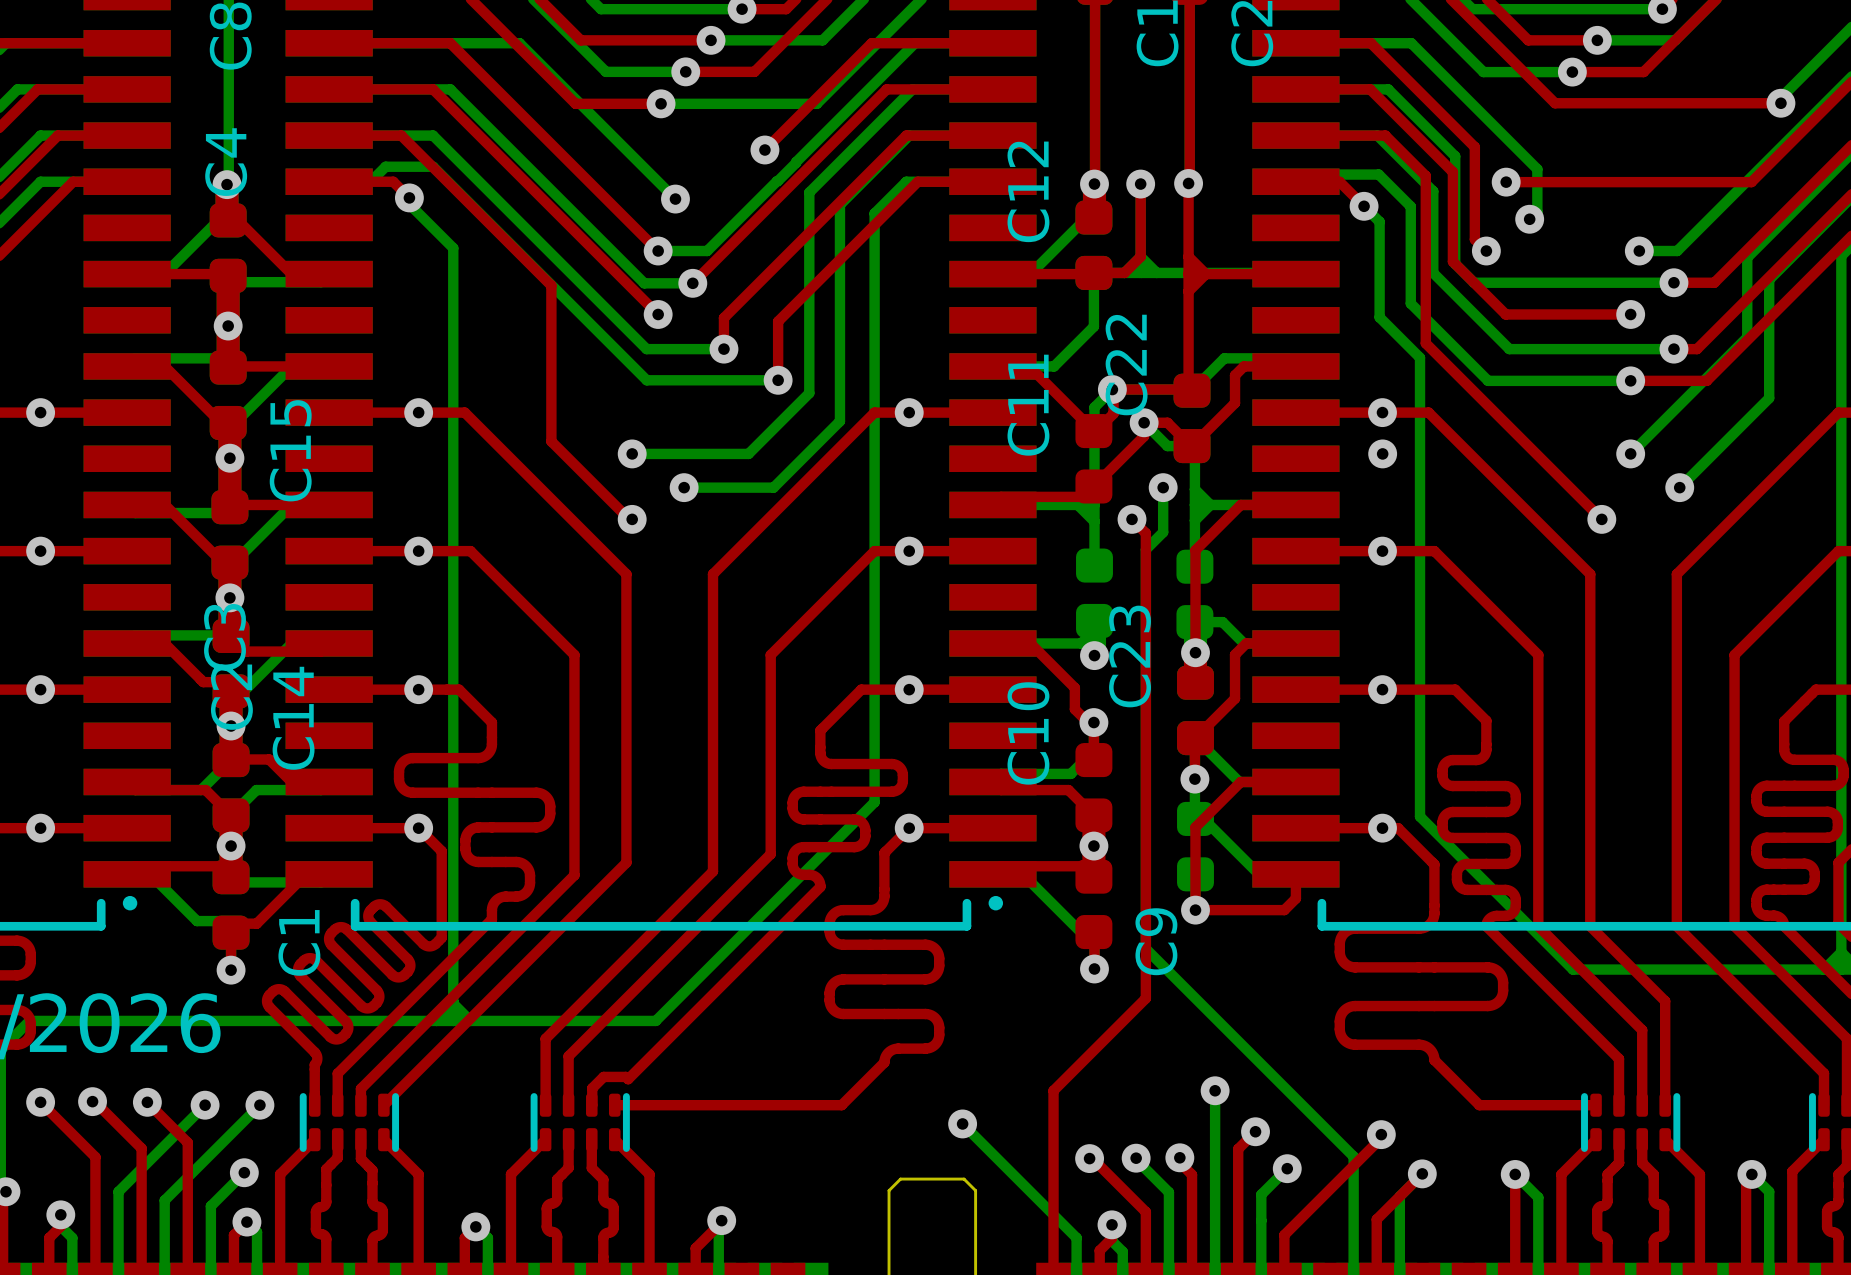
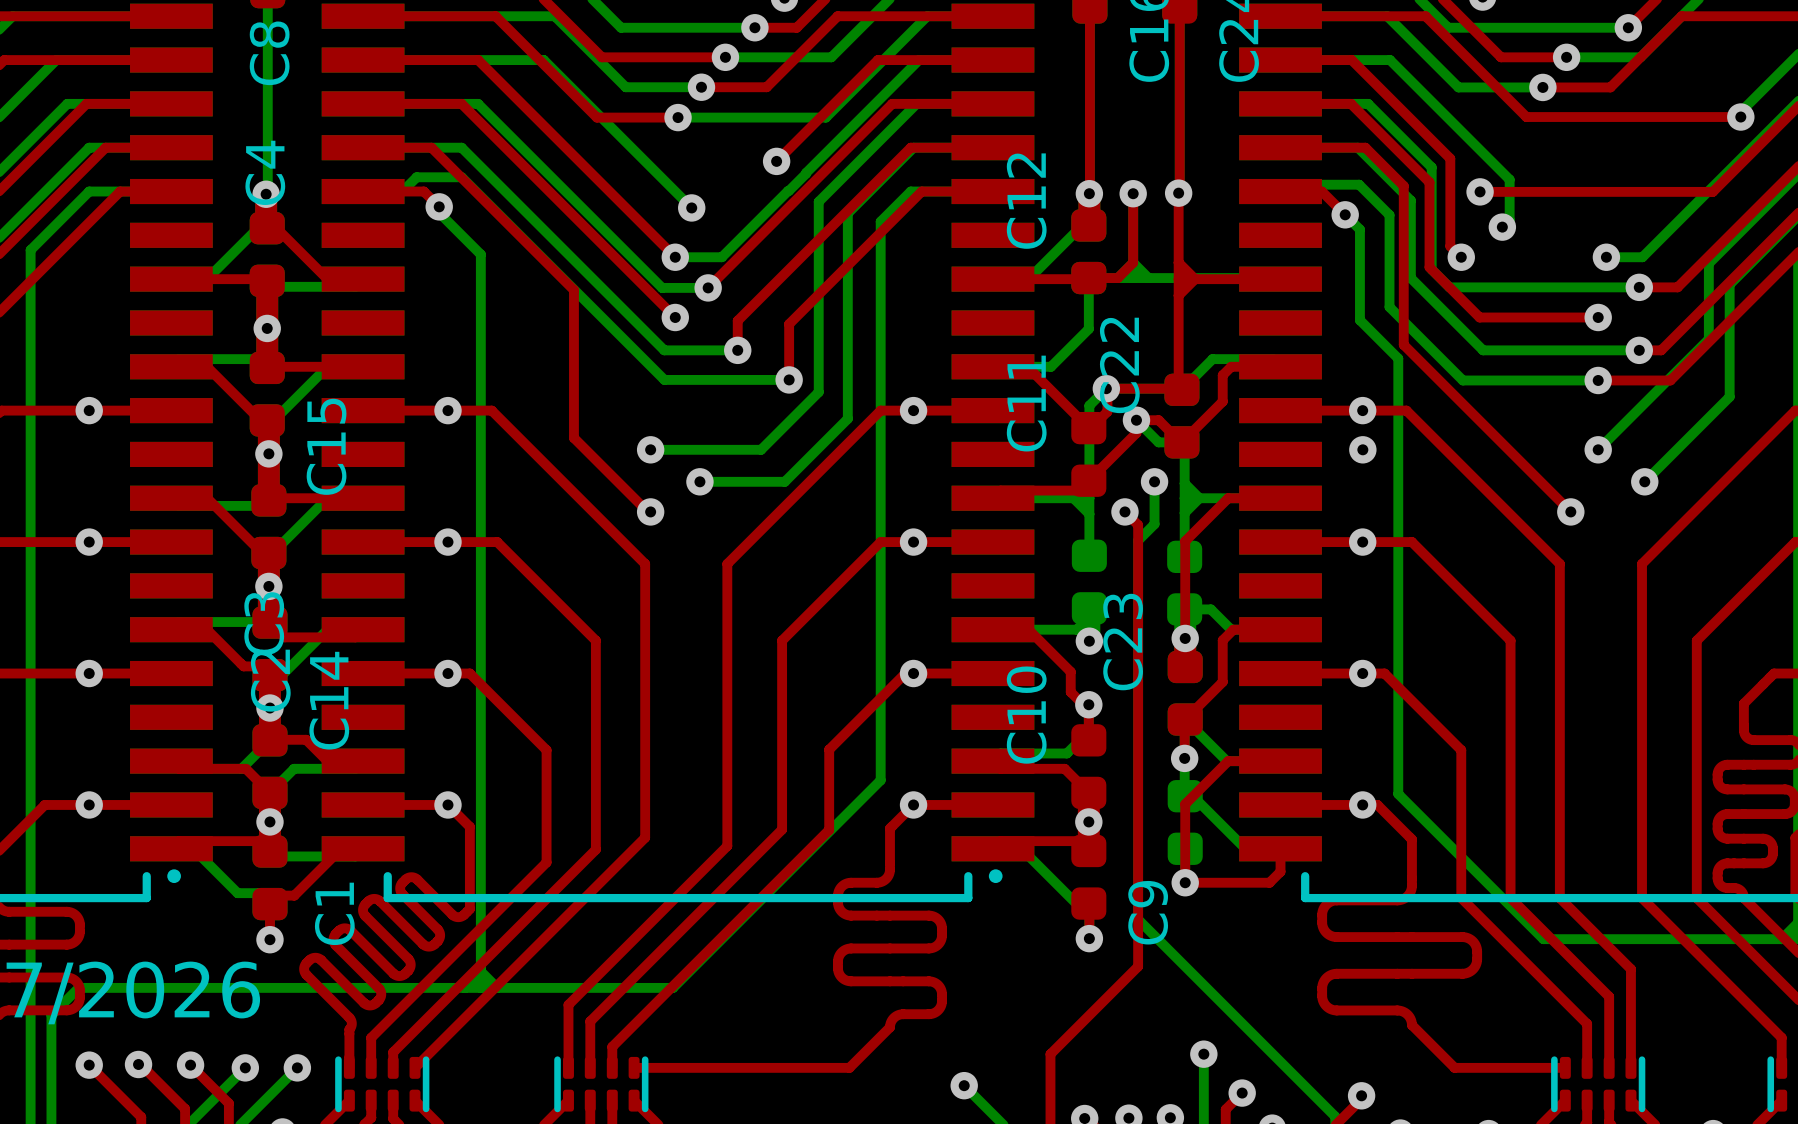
top track: (441, 689) (459, 689) (491, 722) (491, 748) (486, 755) (479, 758) (406, 759) (401, 764) (399, 770) (399, 781) (403, 788) (412, 792) (537, 792) (546, 796) (549, 803) (549, 818) (540, 826) (477, 827) (471, 829) (466, 834) (465, 851) (471, 859) (478, 861) (519, 862) (524, 865) (529, 871) (529, 884) (527, 891) (519, 896) (504, 896) (497, 899) (492, 907) (491, 919) -> (469, 673) (546, 750) (546, 862) (517, 891)
top track: (900, 689) (861, 689) (820, 730) (820, 755) (826, 762) (893, 764) (900, 768) (902, 775) (901, 785) (894, 791) (803, 791) (795, 795) (792, 801) (792, 810) (798, 818) (855, 819) (861, 821) (865, 828) (864, 839) (857, 846) (802, 847) (795, 851) (792, 858) (795, 870) (800, 874) (815, 876) (820, 885) -> none
top track: (1405, 689) (1455, 689) (1486, 720) (1484, 754) (1477, 759) (1451, 760) (1446, 762) (1442, 770) (1442, 778) (1445, 782) (1452, 786) (1506, 786) (1515, 792) (1515, 804) (1509, 811) (1451, 812) (1446, 814) (1442, 819) (1443, 831) (1448, 837) (1506, 838) (1515, 844) (1515, 856) (1509, 863) (1465, 864) (1457, 870) (1457, 882) (1463, 889) (1506, 890) (1514, 895) (1515, 906) (1512, 912) (1508, 915) (1491, 917) (1486, 926) -> (1384, 673) (1461, 750) (1461, 898)
top track: (820, 887) (628, 1079) (625, 1076) (603, 1076) (592, 1088) (592, 1105) -> (905, 673) (829, 749) (829, 829) (612, 1046) (612, 1067)

